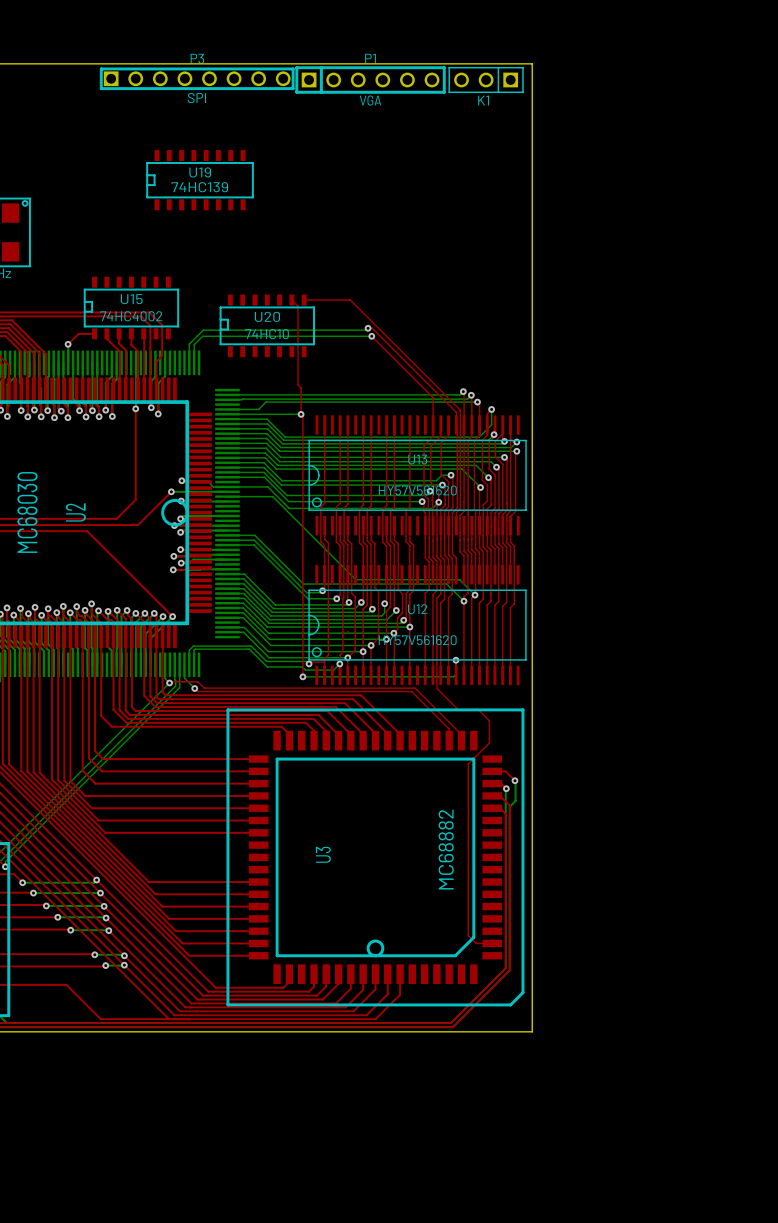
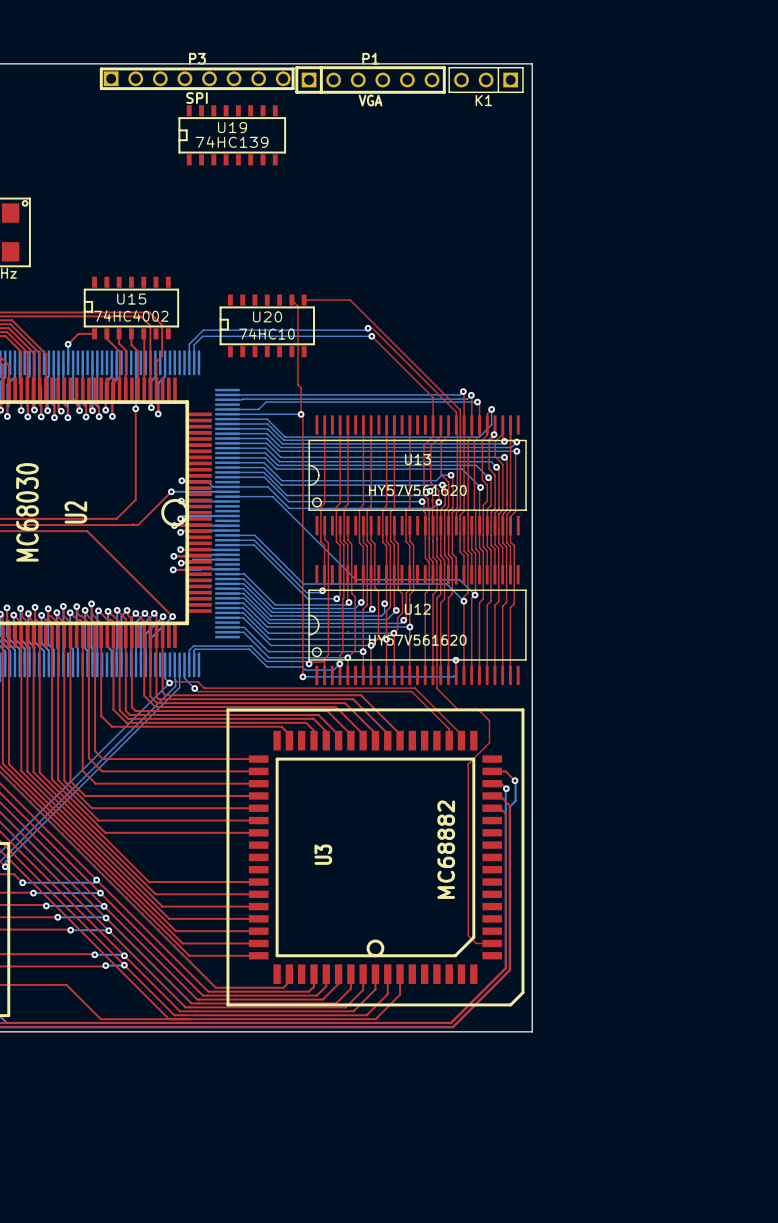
U19 position: (200, 180) -> (232, 135)

